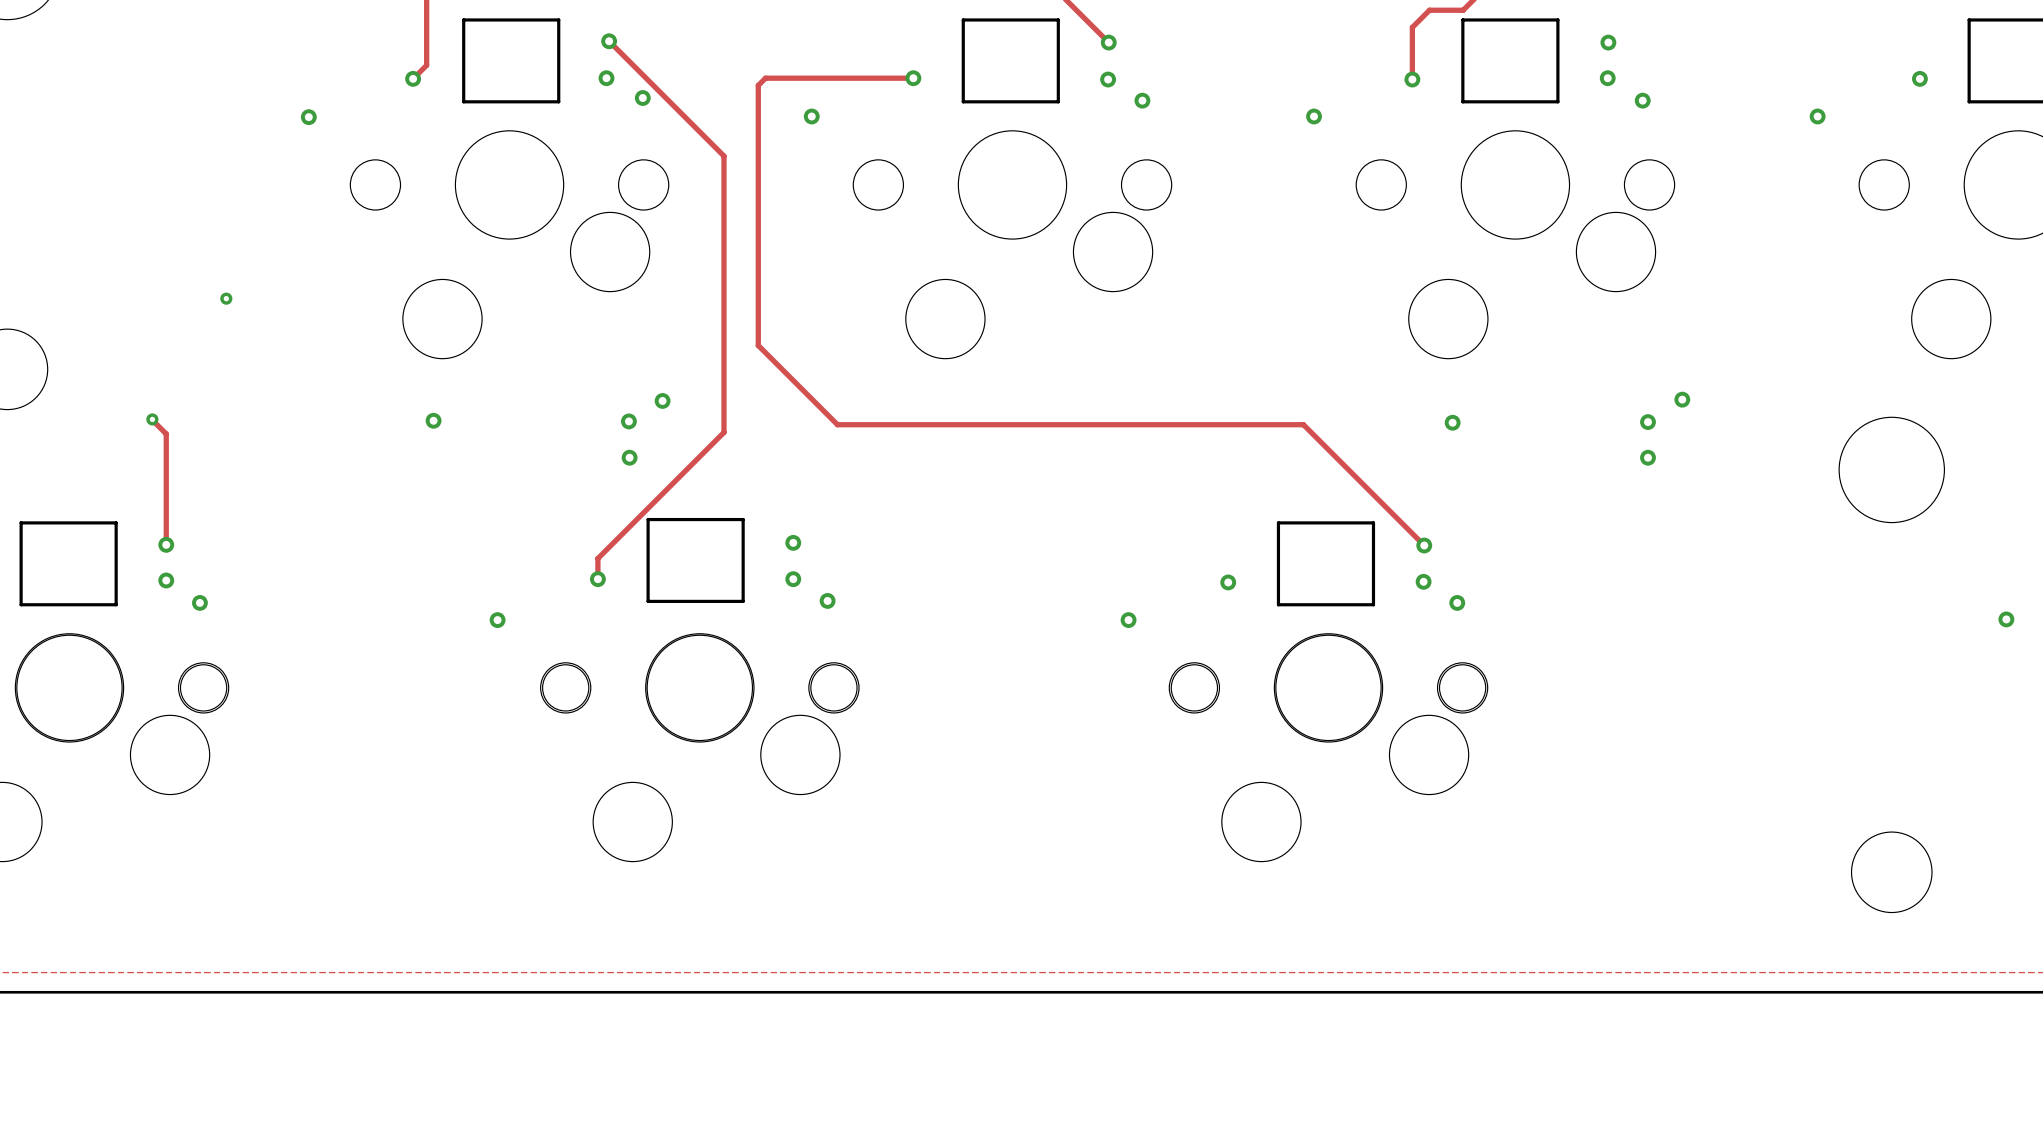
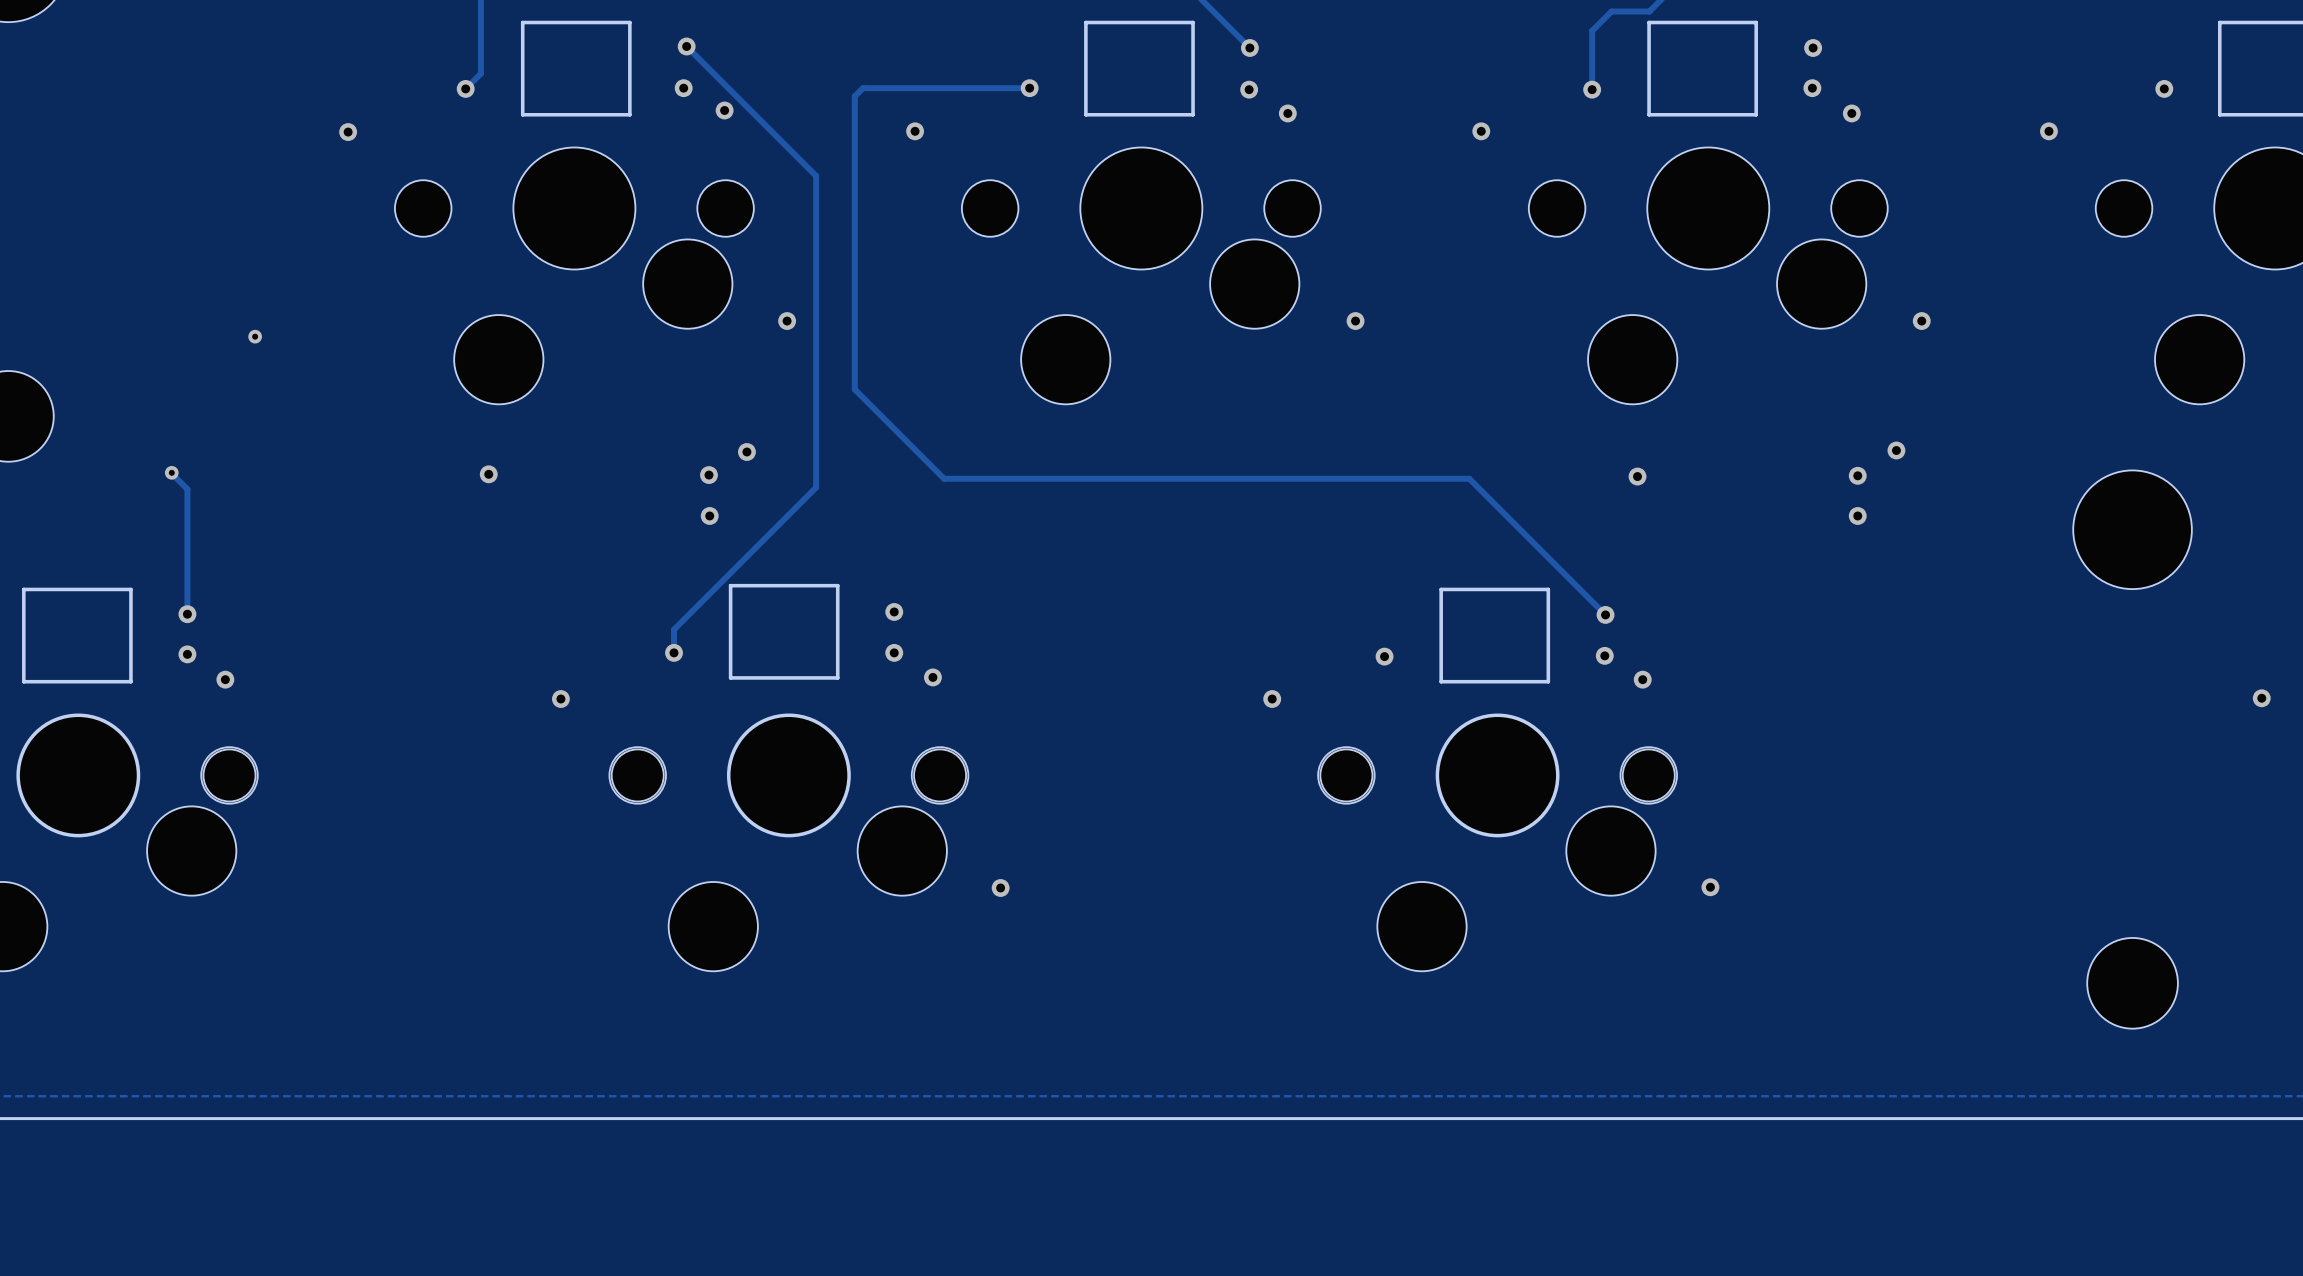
via: none -> (787, 321)
via: none -> (1355, 321)
via: none -> (1921, 321)
via: none -> (1000, 887)
via: none -> (1710, 887)

